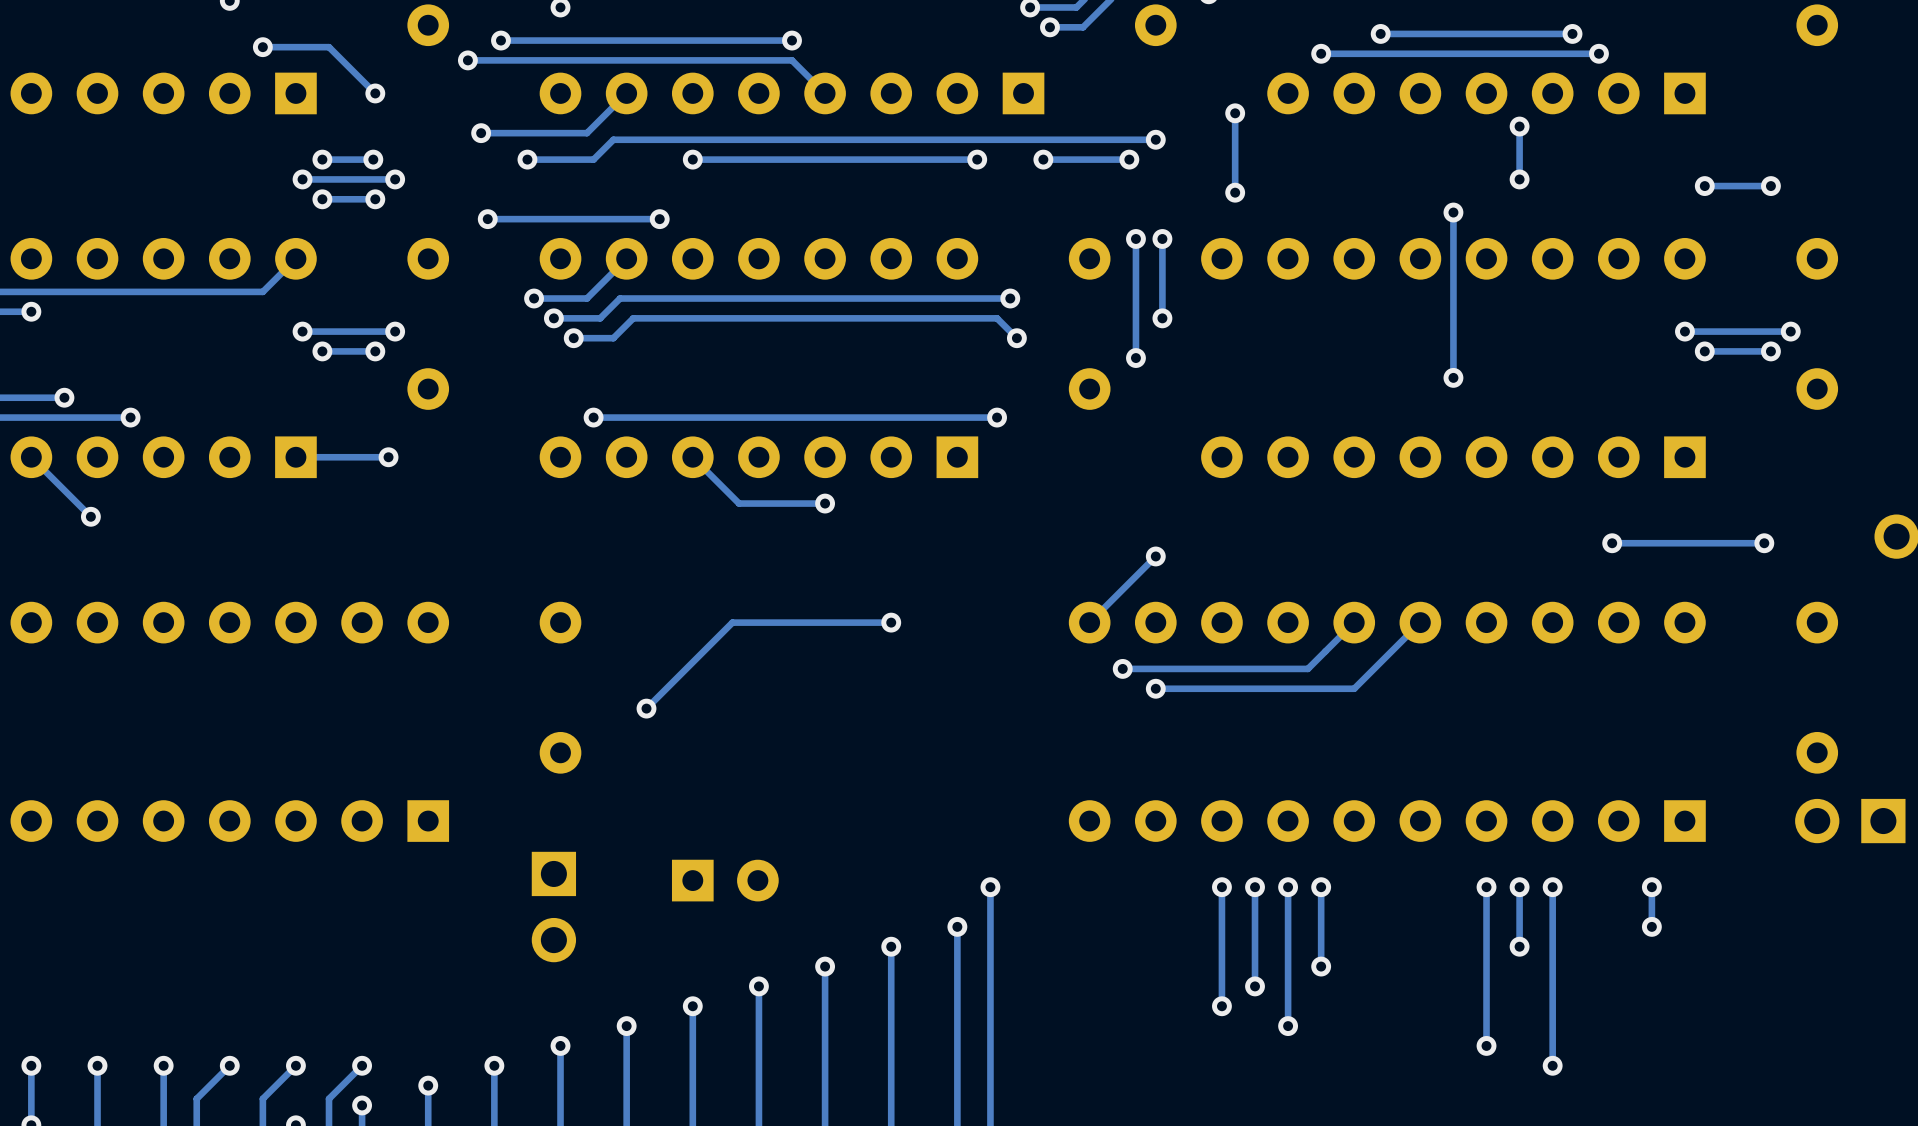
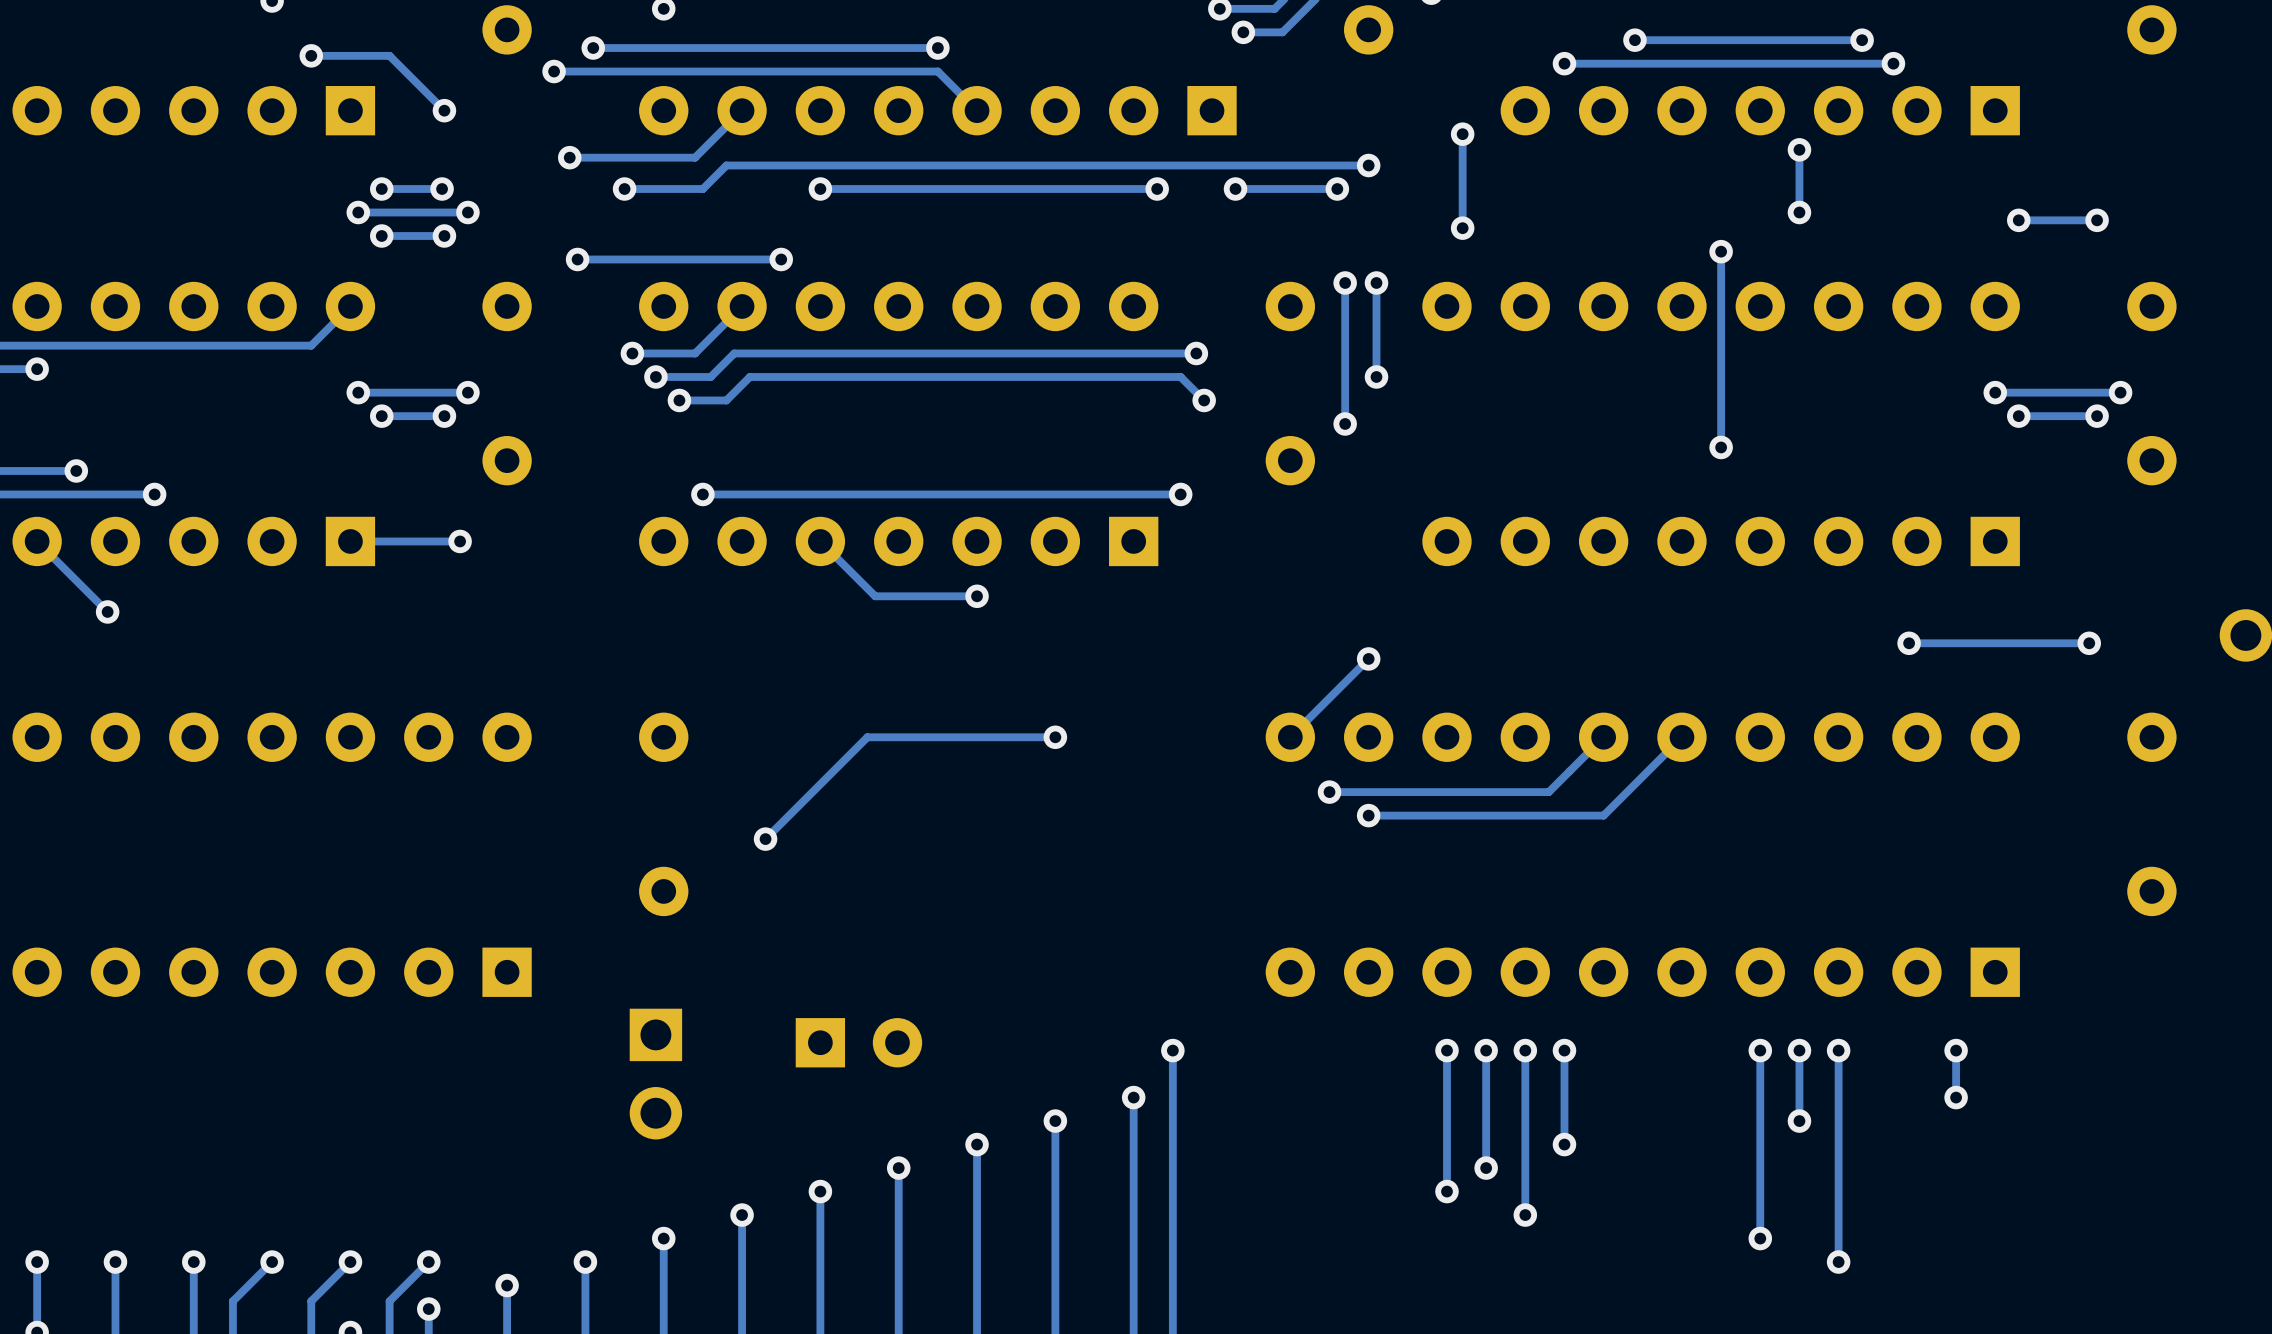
part: (1850, 821) -> none

